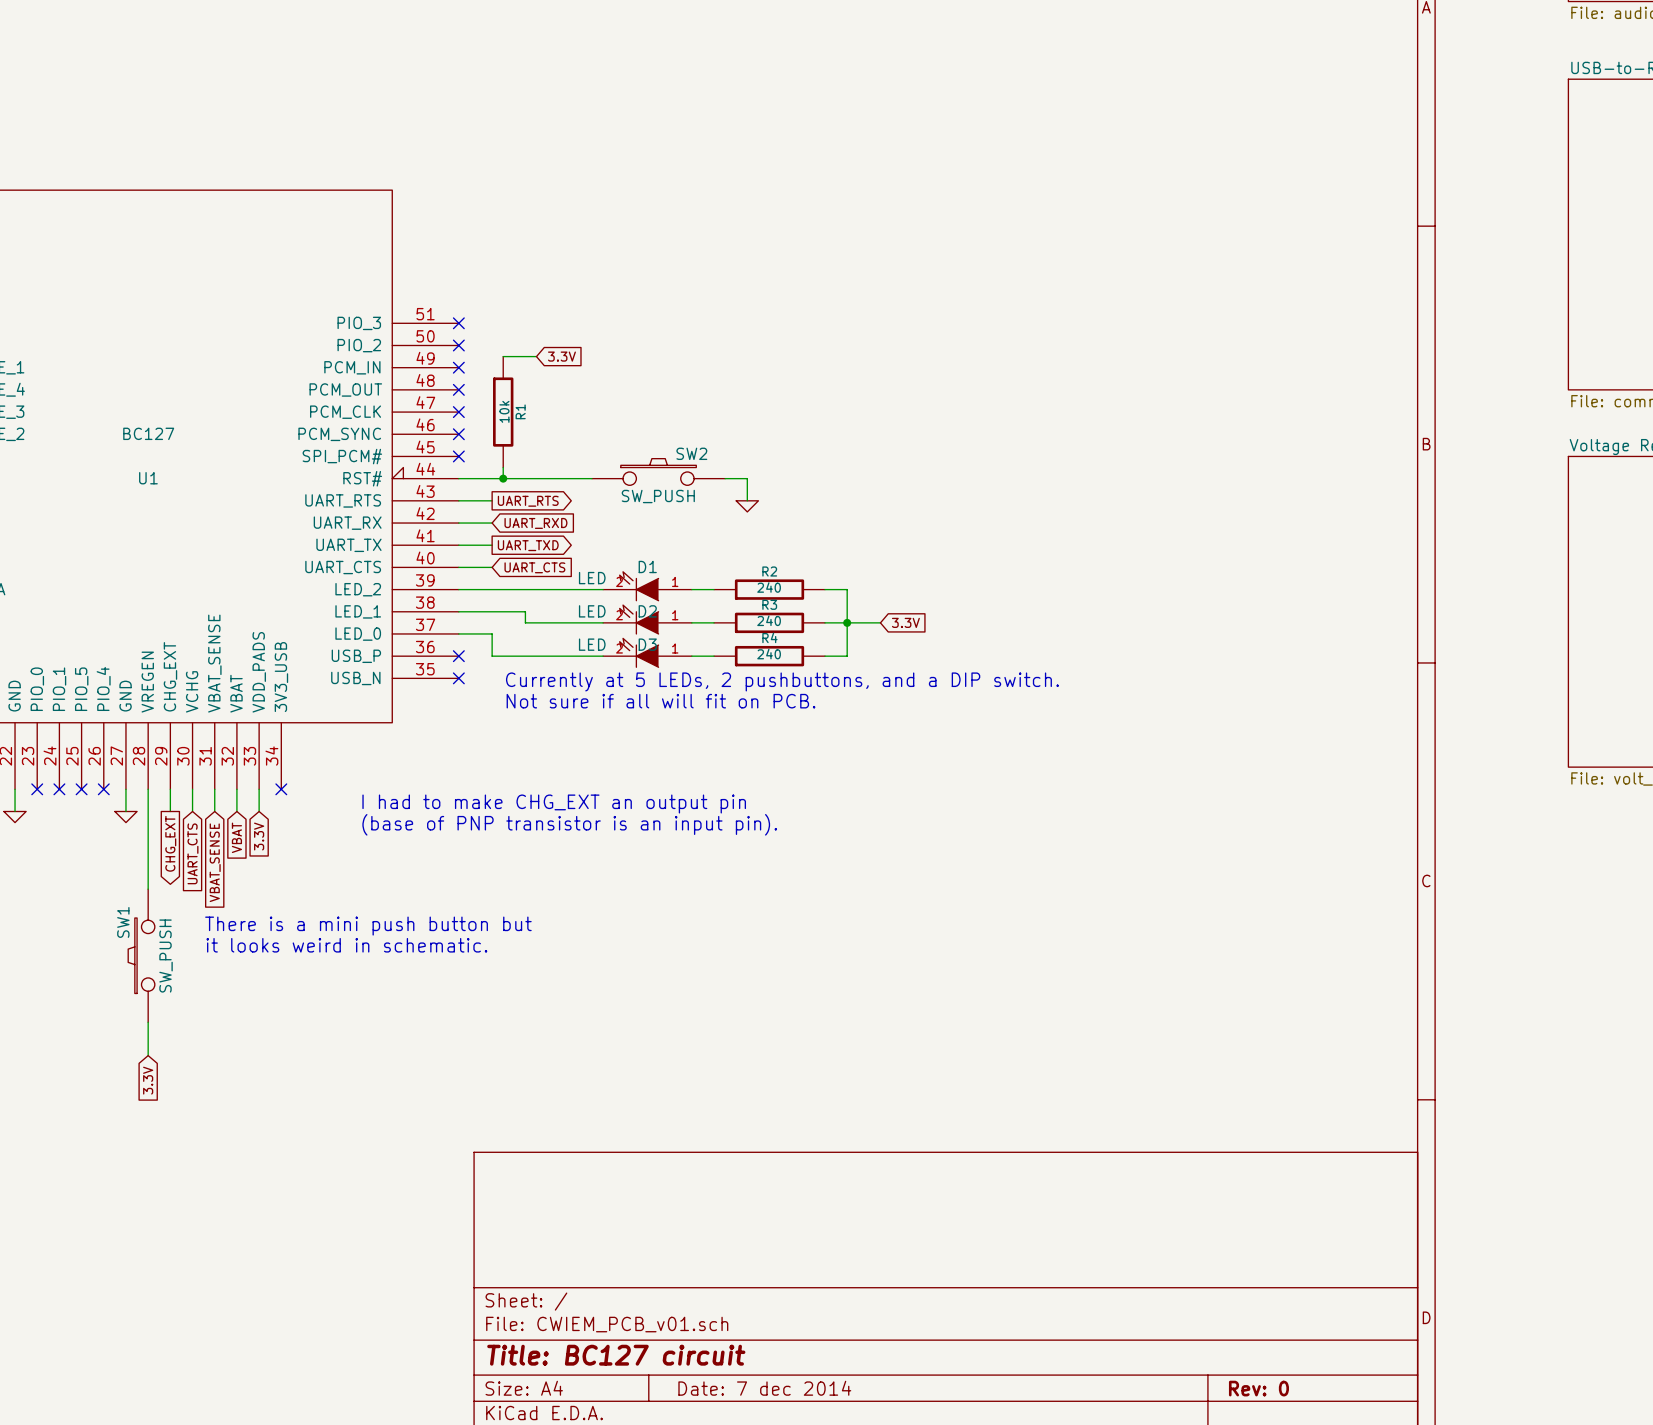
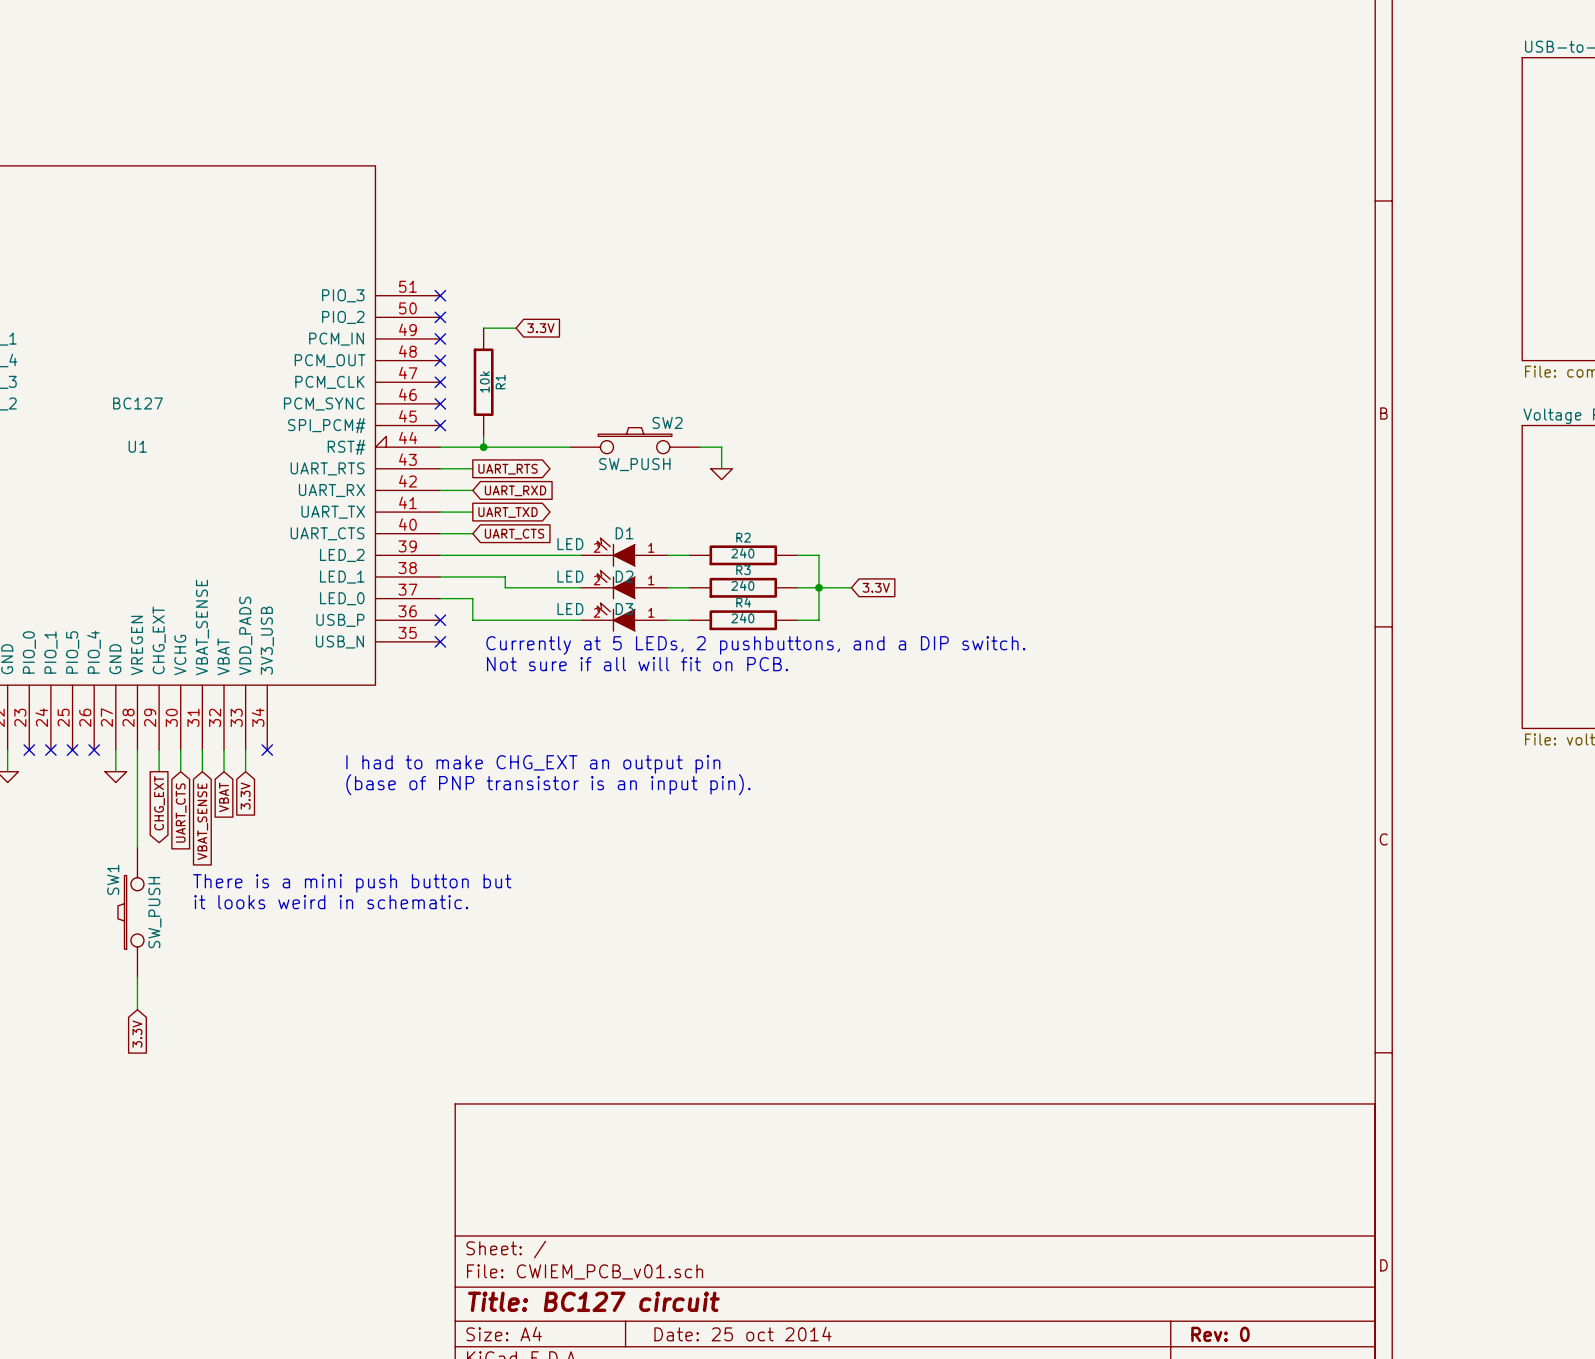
title block: Date: 7 dec 2014 (764, 1388) -> Date: 25 oct 2014 (742, 1334)

